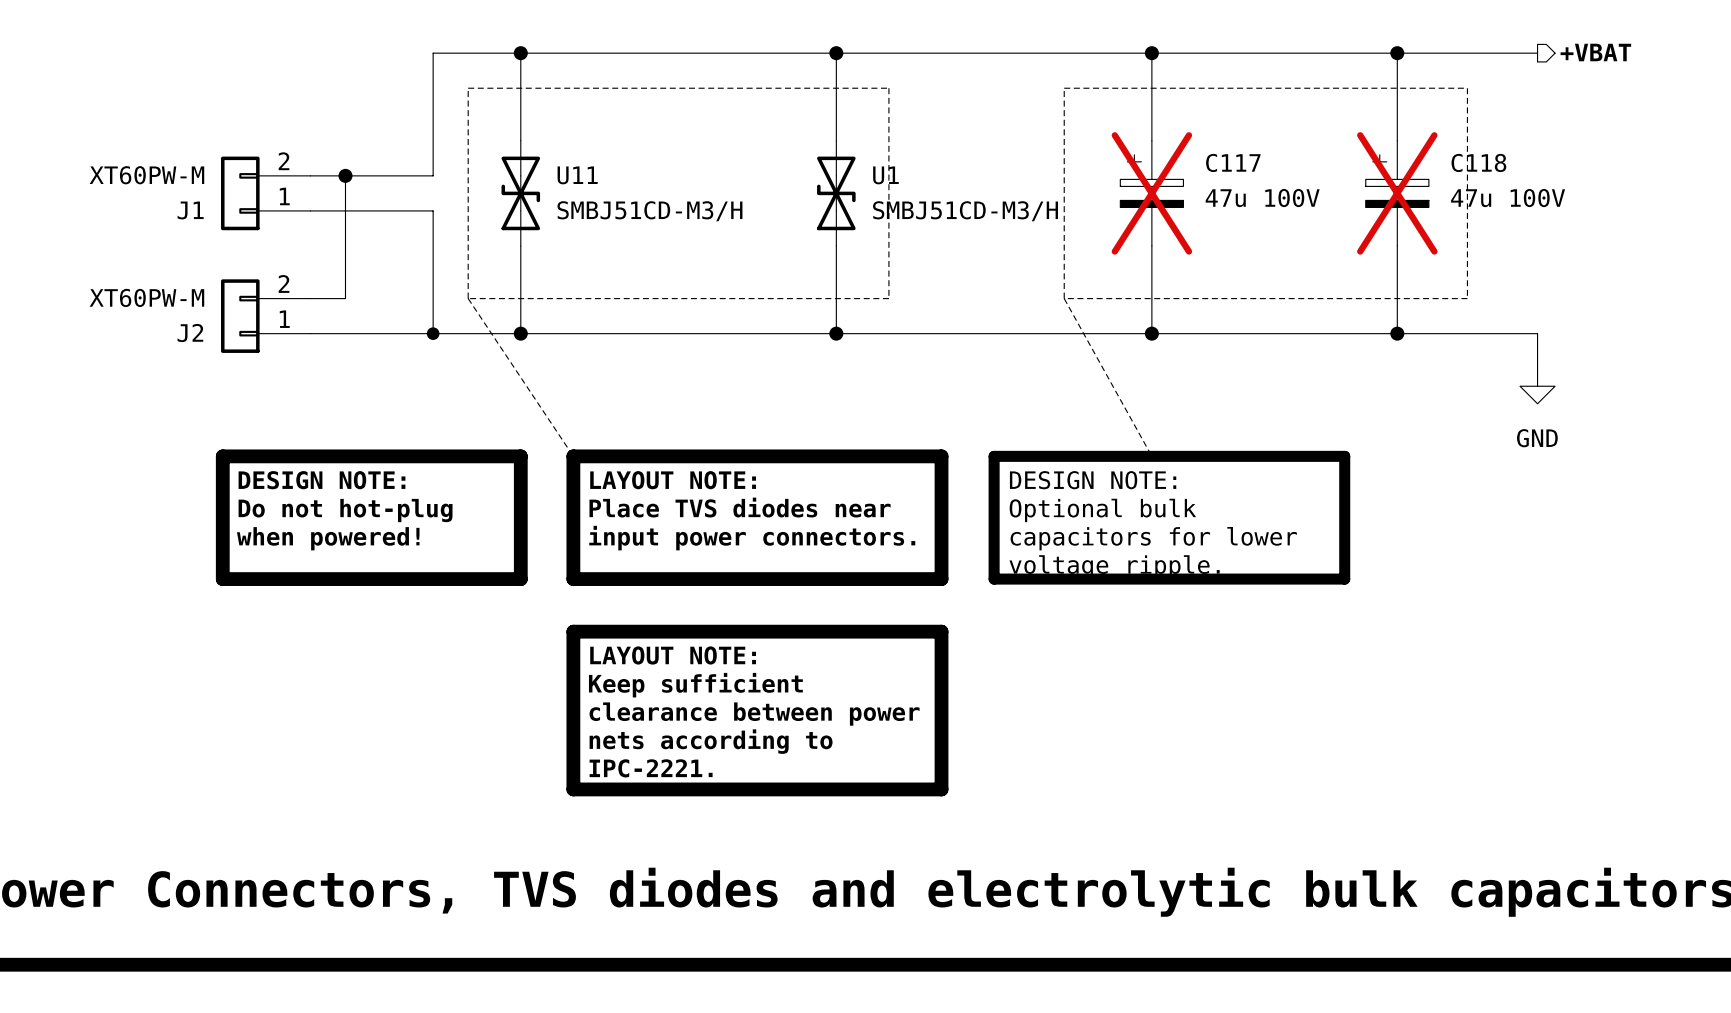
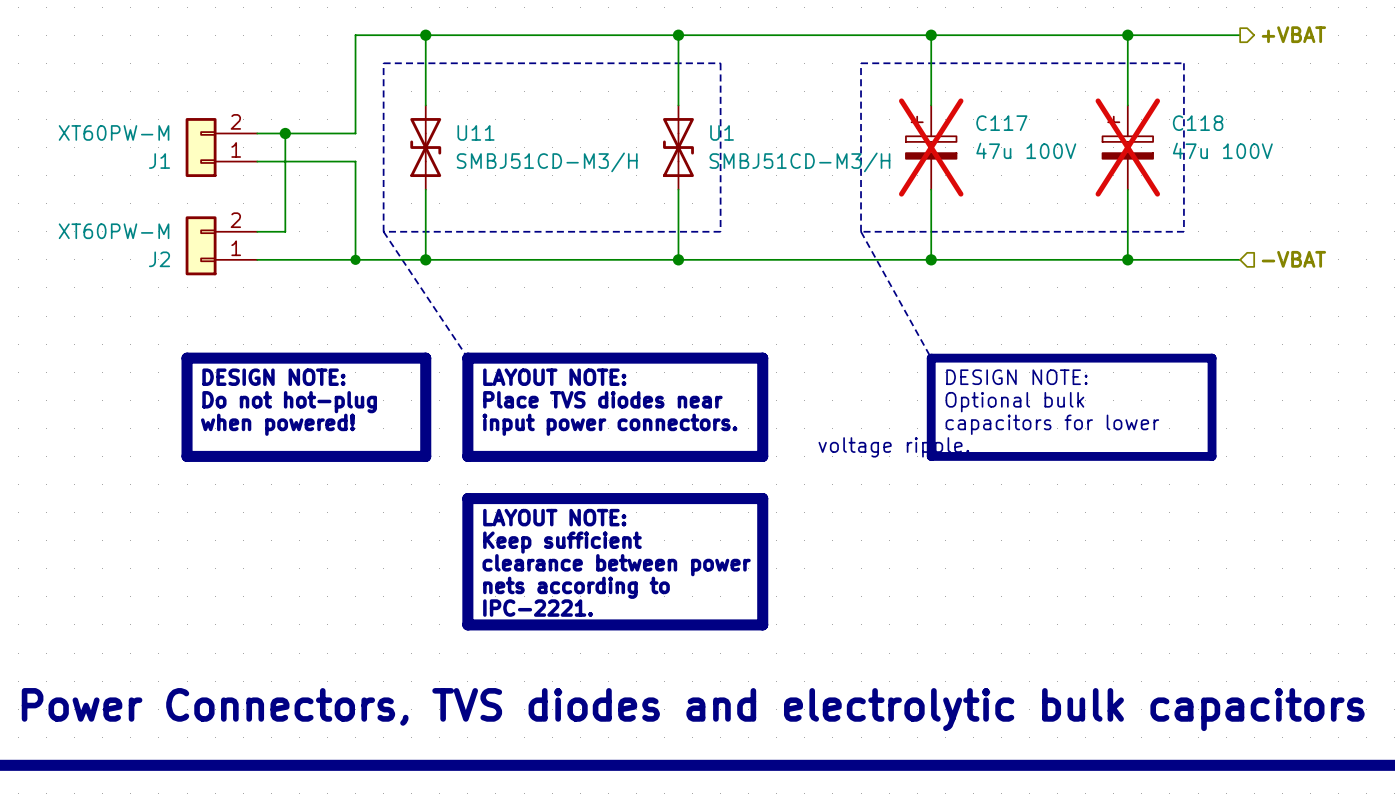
hierarchical label: none -> -VBAT (1293, 259)
wire: (1537, 333) (1537, 368) -> none
power symbol: GND (1537, 386) -> none
line: (1151, 456) (994, 456) (994, 579) (1151, 579) -> (931, 358) (931, 456)
line: (1344, 456) (1344, 579) -> (1085, 358) (1212, 358) (1212, 456) (1085, 456)
text position: DESIGN NOTE: (1093, 480) -> DESIGN NOTE: (1016, 377)
text position: Optional bulk (1102, 510) -> Optional bulk (1014, 402)
text position: capacitors for lower (1153, 538) -> capacitors for lower (1052, 424)

